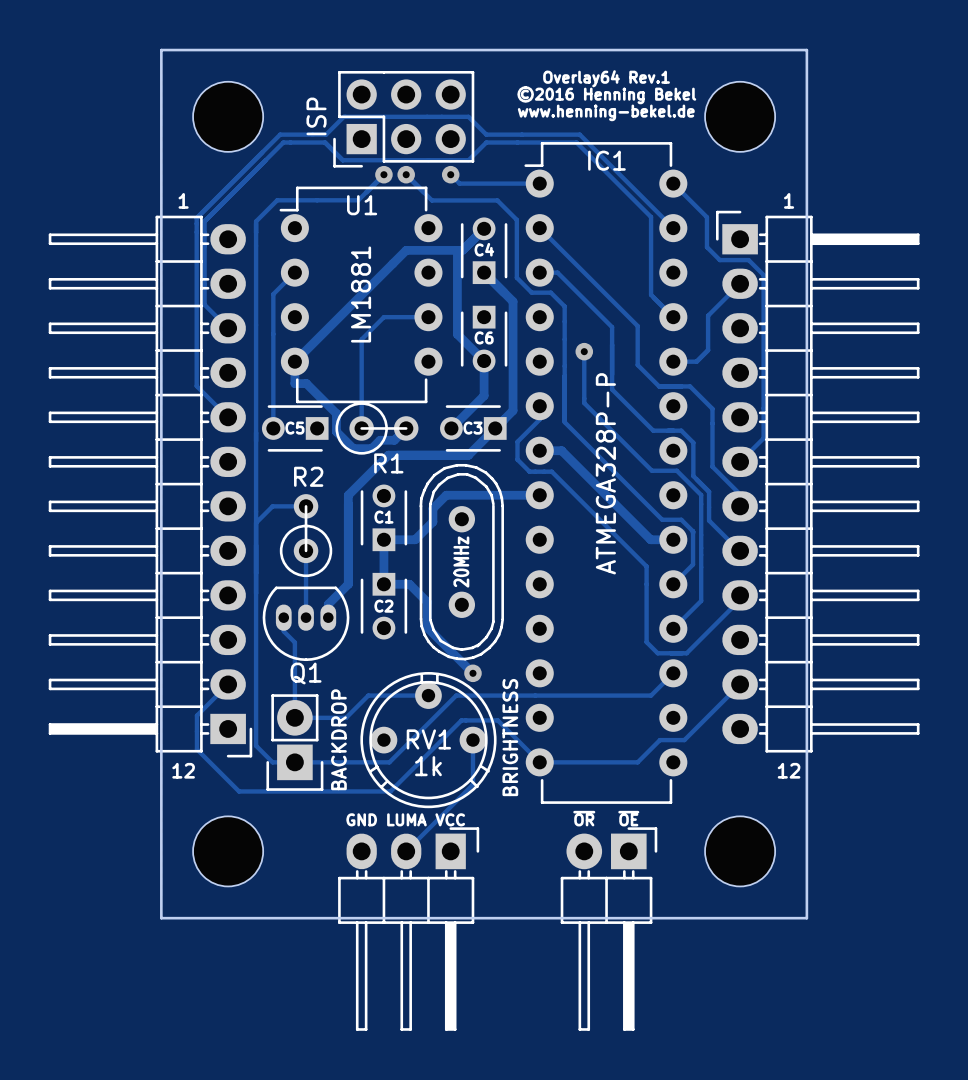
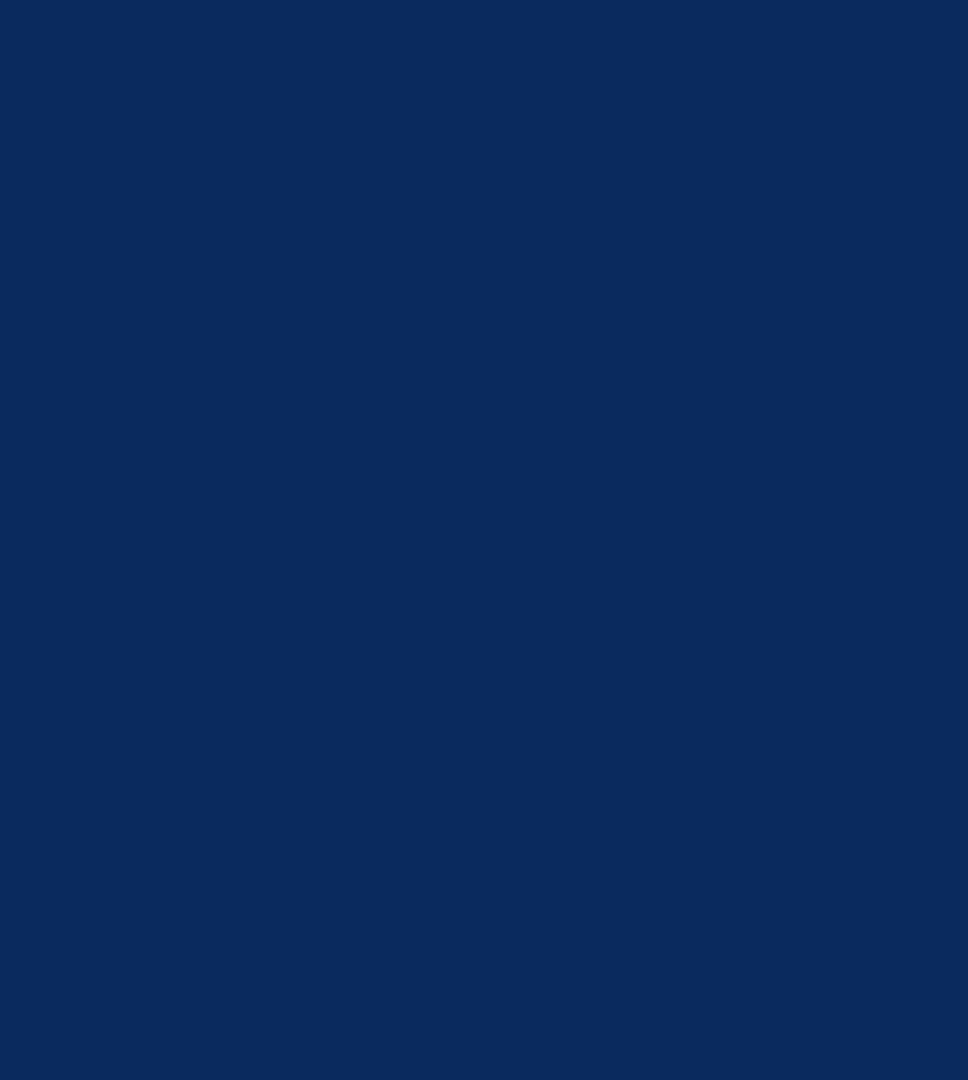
board edge: (161, 50) (806, 50) (806, 918) (161, 918) (161, 50) -> none
text: Overlay64 Rev.1 (606, 78) -> none
text: ©2016 Henning Bekel (606, 95) -> none
text: www.henning-bekel.de (606, 112) -> none
part: (228, 116) -> none
part: (740, 116) -> none
part: ISP (403, 119) -> none
track: (383, 174) (358, 200) (277, 200) (256, 221) (256, 745) (272, 762) (389, 762) (456, 695) (651, 695) (673, 673) -> none
via: (383, 174) -> none
track: (406, 174) (431, 200) (497, 200) (516, 219) (516, 277) (531, 292) (550, 292) (564, 306) (564, 422) (662, 519) (681, 519) (693, 531) -> none
via: (406, 174) -> none
track: (450, 174) (459, 183) (539, 183) -> none
via: (450, 174) -> none
track: (673, 183) (706, 217) (706, 247) (719, 260) (748, 260) (763, 275) (763, 438) (740, 461) -> none
text: 1 (183, 200) -> none
text: 1 (789, 200) -> none
track: (484, 228) (462, 250) (406, 250) (294, 361) (294, 383) (306, 383) (336, 413) (336, 431) (353, 448) (371, 448) (380, 440) (394, 440) (406, 428) -> none
track: (542, 228) (539, 228) (637, 326) (637, 365) (659, 386) (690, 386) (712, 408) (712, 466) (740, 494) (740, 506) -> none
track: (673, 228) (579, 134) (486, 134) (468, 116) (343, 116) (326, 134) (280, 134) (196, 218) (196, 386) (227, 417) -> none
text: C4 (484, 249) -> none
track: (457, 250) (457, 334) (484, 360) -> none
part: (484, 250) -> none
track: (294, 272) (273, 294) (273, 428) -> none
track: (484, 272) (513, 301) (513, 410) (468, 455) (388, 455) (348, 495) (348, 584) (328, 604) (328, 617) -> none
track: (539, 272) (557, 272) (612, 327) (612, 389) (653, 430) (681, 430) (693, 442) (693, 476) (709, 491) (709, 520) (739, 550) -> none
track: (740, 283) (708, 315) (708, 350) (696, 361) (673, 361) (673, 350) -> none
U1: LM1881 (361, 294) -> none
track: (428, 317) (383, 317) (361, 339) (361, 428) -> none
track: (673, 317) (651, 294) (651, 217) (576, 142) (486, 142) (468, 160) (342, 160) (325, 142) (283, 142) (204, 221) (204, 304) (228, 328) -> none
text: C6 (484, 337) -> none
part: (484, 339) -> none
track: (584, 351) (584, 403) (651, 470) (676, 470) (701, 495) (701, 600) (673, 628) -> none
via: (584, 351) -> none
track: (484, 360) (484, 395) (450, 428) -> none
track: (539, 406) (539, 419) (517, 441) (517, 459) (529, 471) (551, 471) (646, 566) (646, 642) (657, 653) (686, 653) (740, 599) -> none
text: C5 (294, 428) -> none
part: (295, 428) -> none
R1: (376, 428) -> none
text: C3 (472, 428) -> none
part: (473, 428) -> none
track: (539, 450) (561, 450) (650, 539) (673, 539) -> none
IC1: ATMEGA328P-P (605, 472) -> none
part: (817, 481) -> none
part: (150, 486) -> none
track: (539, 495) (446, 495) (432, 508) (432, 521) (415, 539) (383, 539) -> none
track: (306, 506) (272, 506) (256, 522) -> none
part: (383, 517) -> none
text: C1 (383, 517) -> none
track: (693, 531) (693, 564) (673, 584) -> none
R2: (306, 535) -> none
track: (306, 550) (306, 617) -> none
track: (383, 550) (383, 584) (409, 584) (427, 602) (427, 627) (472, 673) -> none
part: (461, 562) -> none
text: 20MHz (461, 562) -> none
part: (383, 606) -> none
text: C2 (383, 606) -> none
track: (283, 617) (283, 631) (294, 642) (294, 717) (346, 717) (368, 695) (428, 695) -> none
Q1: (306, 623) -> none
via: (472, 673) -> none
track: (228, 684) (196, 715) (196, 749) (239, 791) (390, 791) (461, 720) (497, 720) (539, 762) (637, 762) (659, 740) (684, 740) (740, 684) -> none
text: BRIGHTNESS (510, 737) -> none
text: BACKDROP (338, 739) -> none
RV1: 1k (428, 740) -> none
track: (472, 740) (472, 784) (406, 851) (406, 843) -> none
part: (294, 742) -> none
text: 12 (183, 770) -> none
text: 12 (789, 770) -> none
text: ~{OR} (584, 818) -> none
text: ~{OE} (628, 818) -> none
text: GND (361, 819) -> none
text: LUMA (406, 819) -> none
text: VCC (450, 819) -> none
part: (228, 851) -> none
part: (740, 851) -> none
part: (408, 929) -> none
part: (608, 929) -> none

